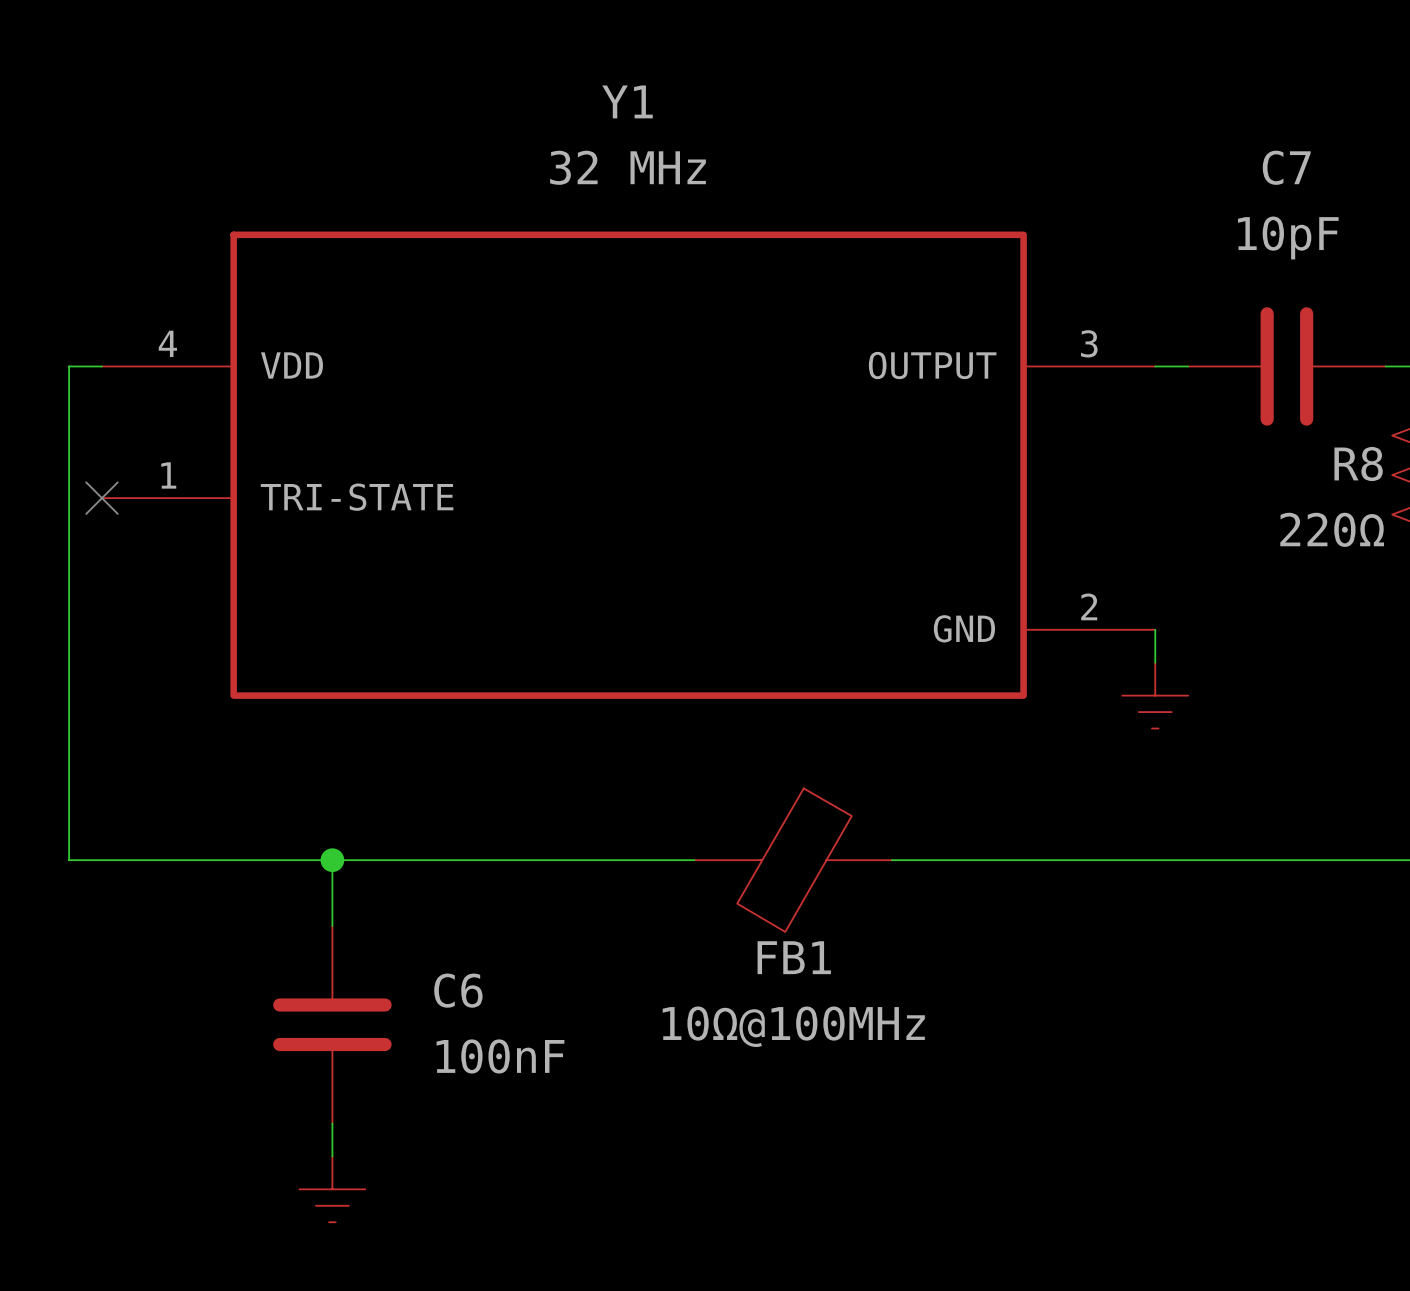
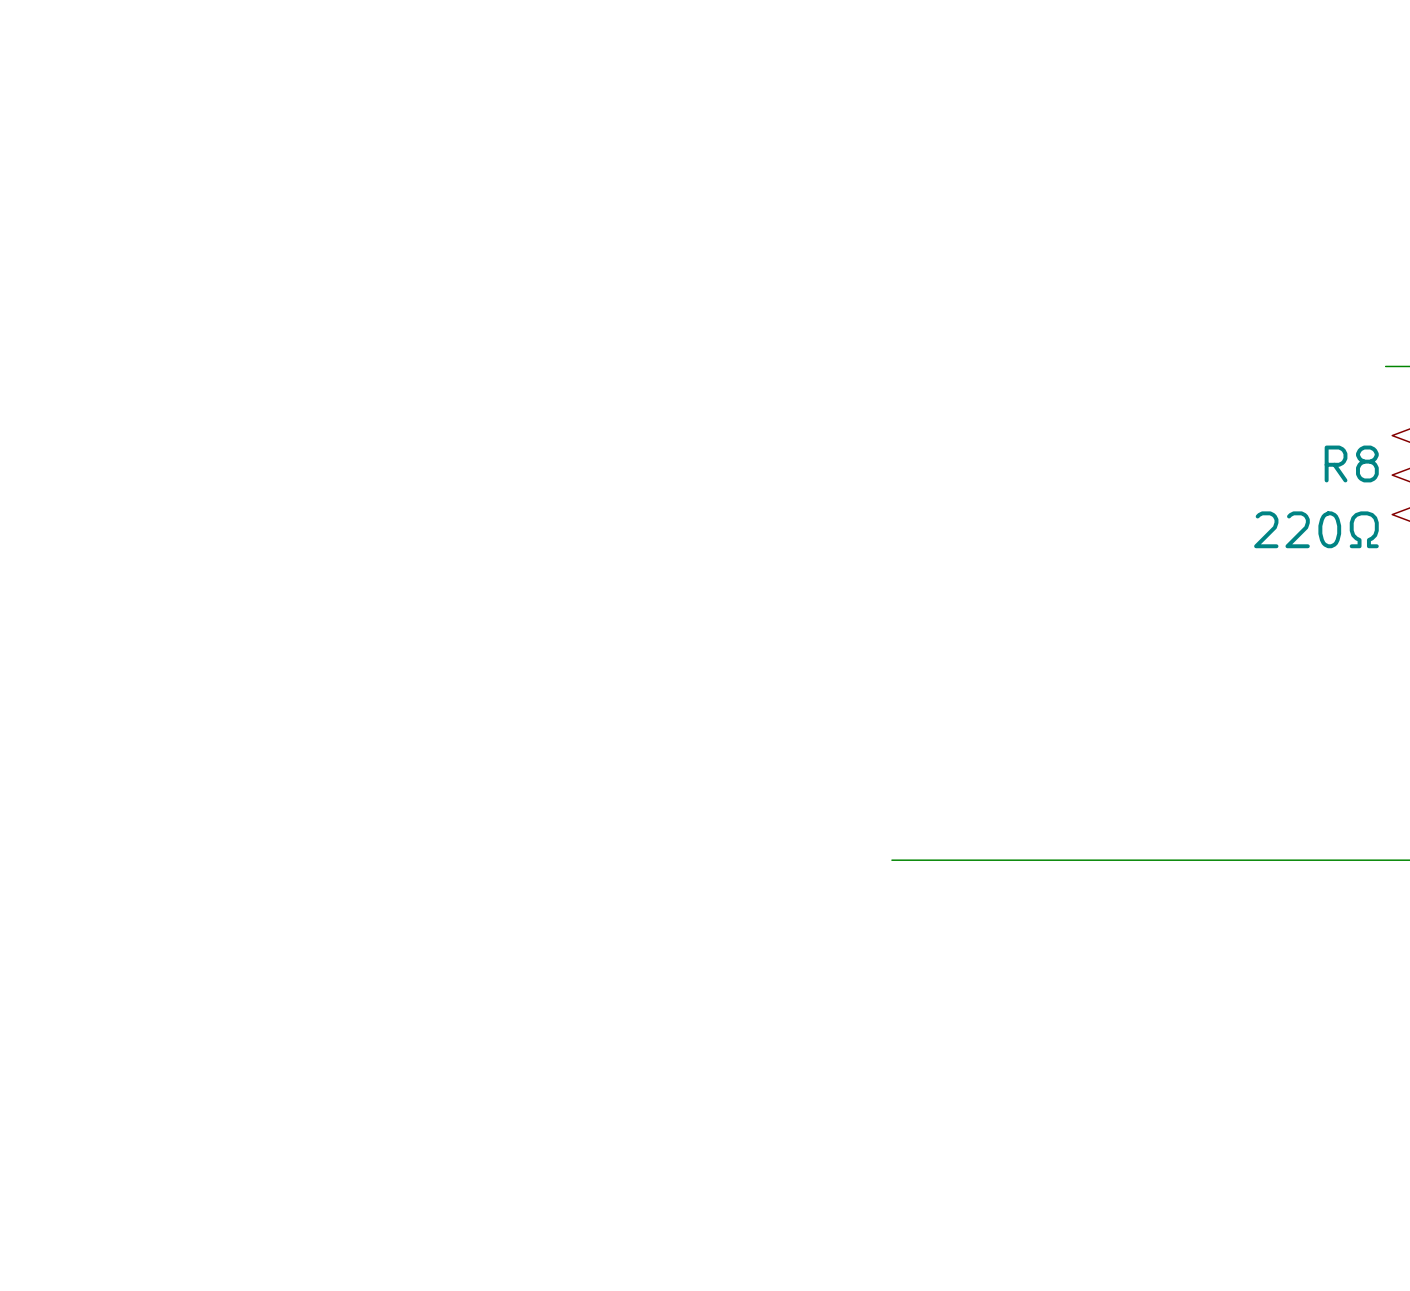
wire: (102, 366) (69, 366) (69, 860) (694, 860) -> none
wire: (1155, 366) (1188, 366) -> none
C7: 10pF (1286, 366) -> none
Y1: 32 MHz (628, 465) -> none
no-connect mark: (102, 498) -> none
wire: (1155, 629) (1155, 662) -> none
power symbol: (1155, 695) -> none
wire: (332, 860) (332, 926) -> none
junction: (332, 860) -> none
FB1: 10Ω@100MHz (793, 860) -> none
C6: 100nF (332, 1024) -> none
wire: (332, 1123) (332, 1156) -> none
power symbol: (332, 1189) -> none

